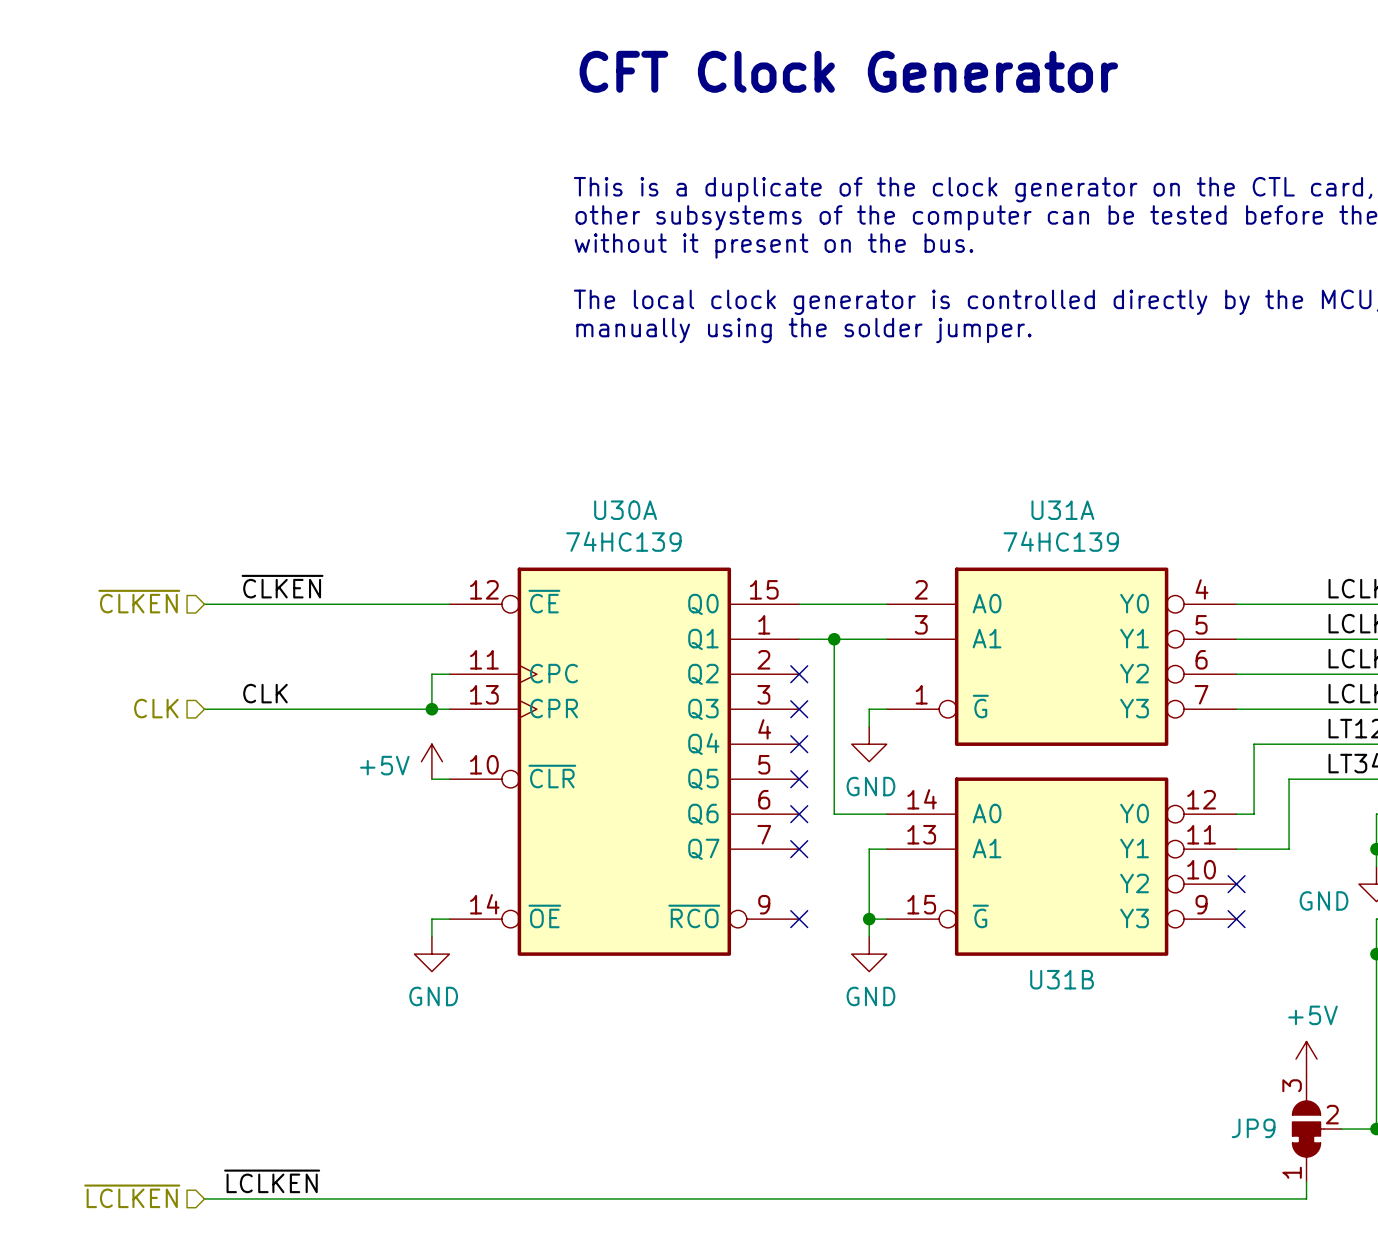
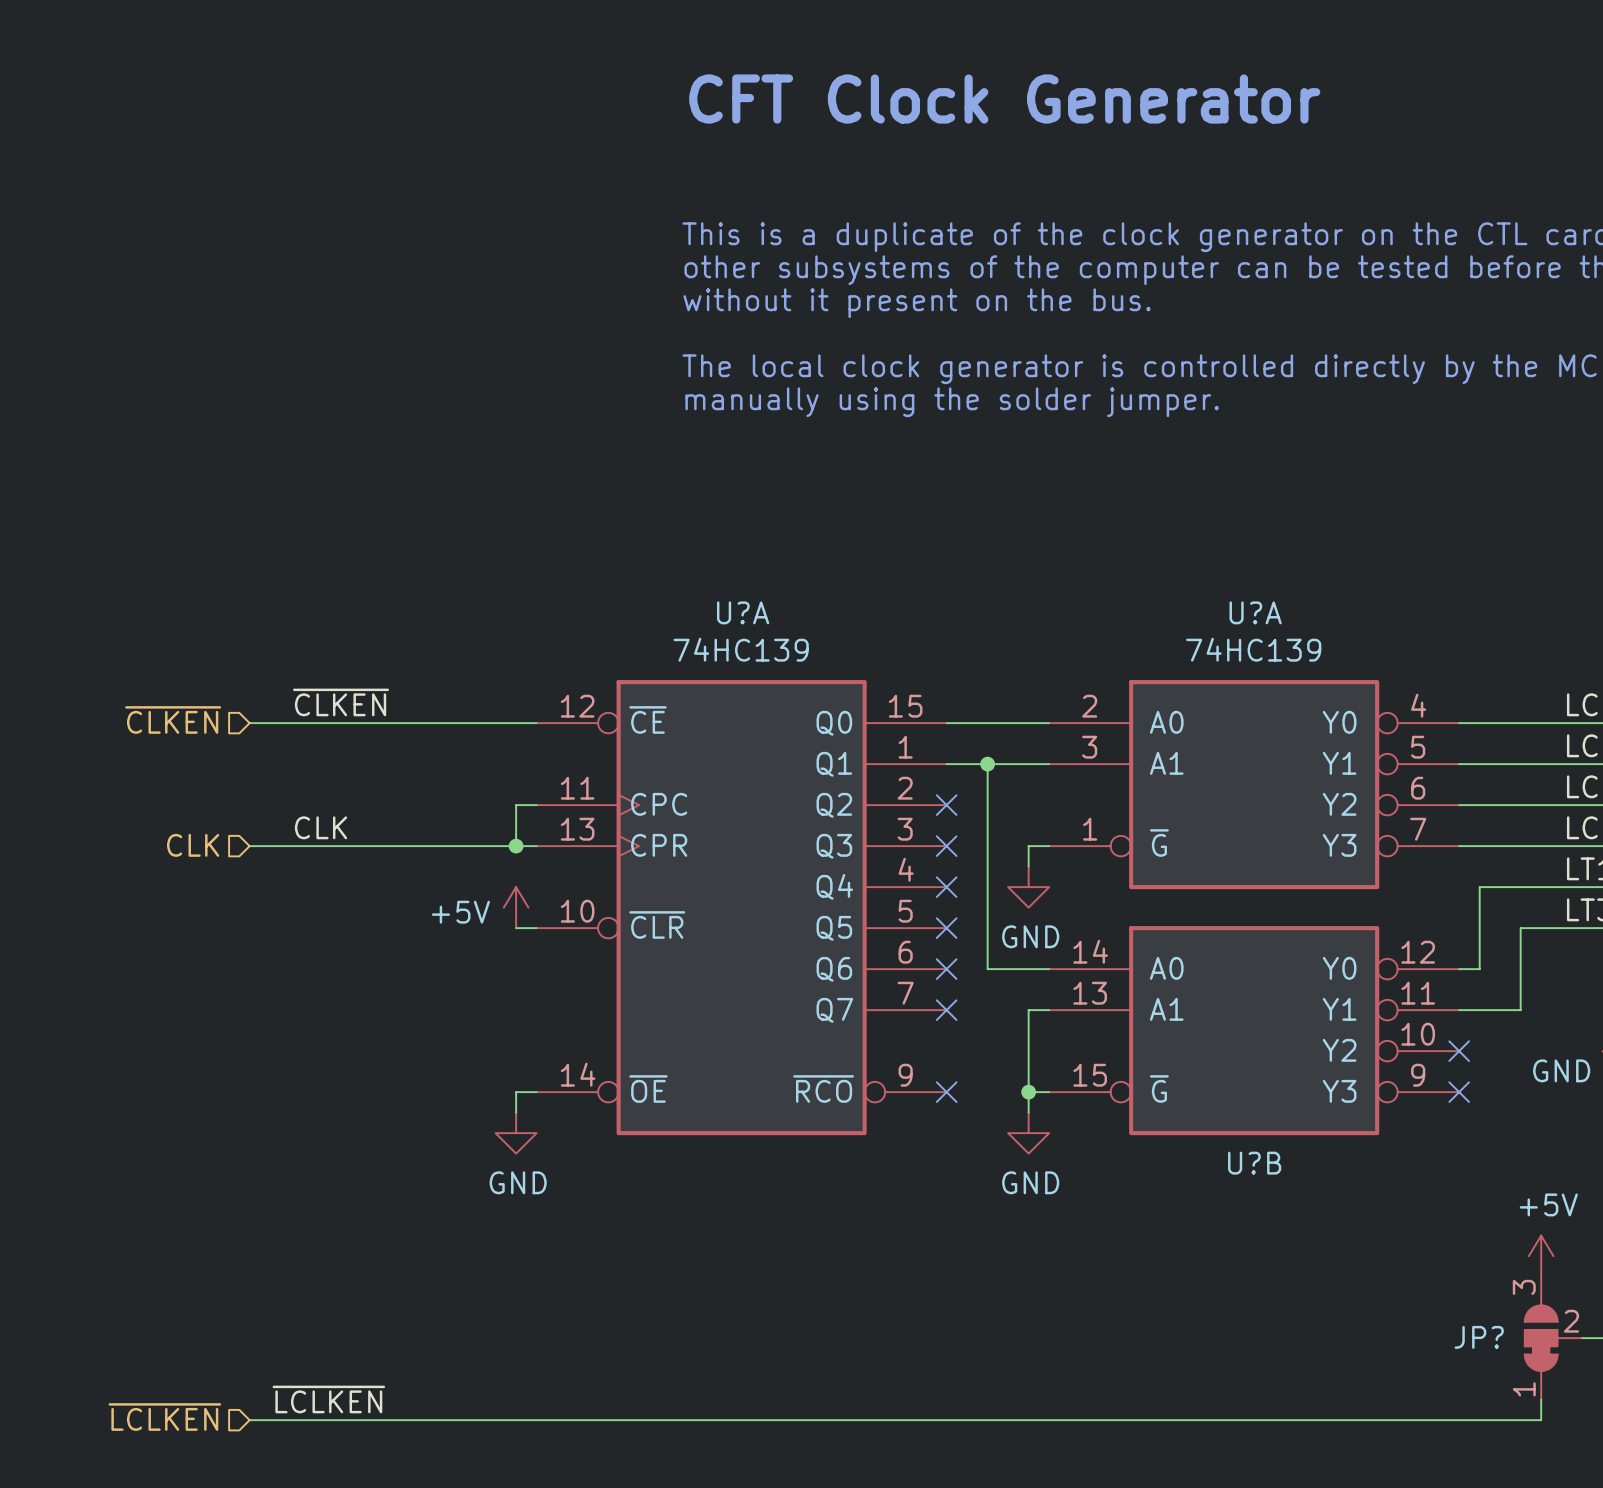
U30A name: U30A (625, 510) -> U?A (743, 612)
U31A name: U31A (1062, 510) -> U?A (1255, 612)
U31B name: U31B (1062, 979) -> U?B (1254, 1163)
JP9 name: JP9 (1253, 1128) -> JP? (1479, 1337)

